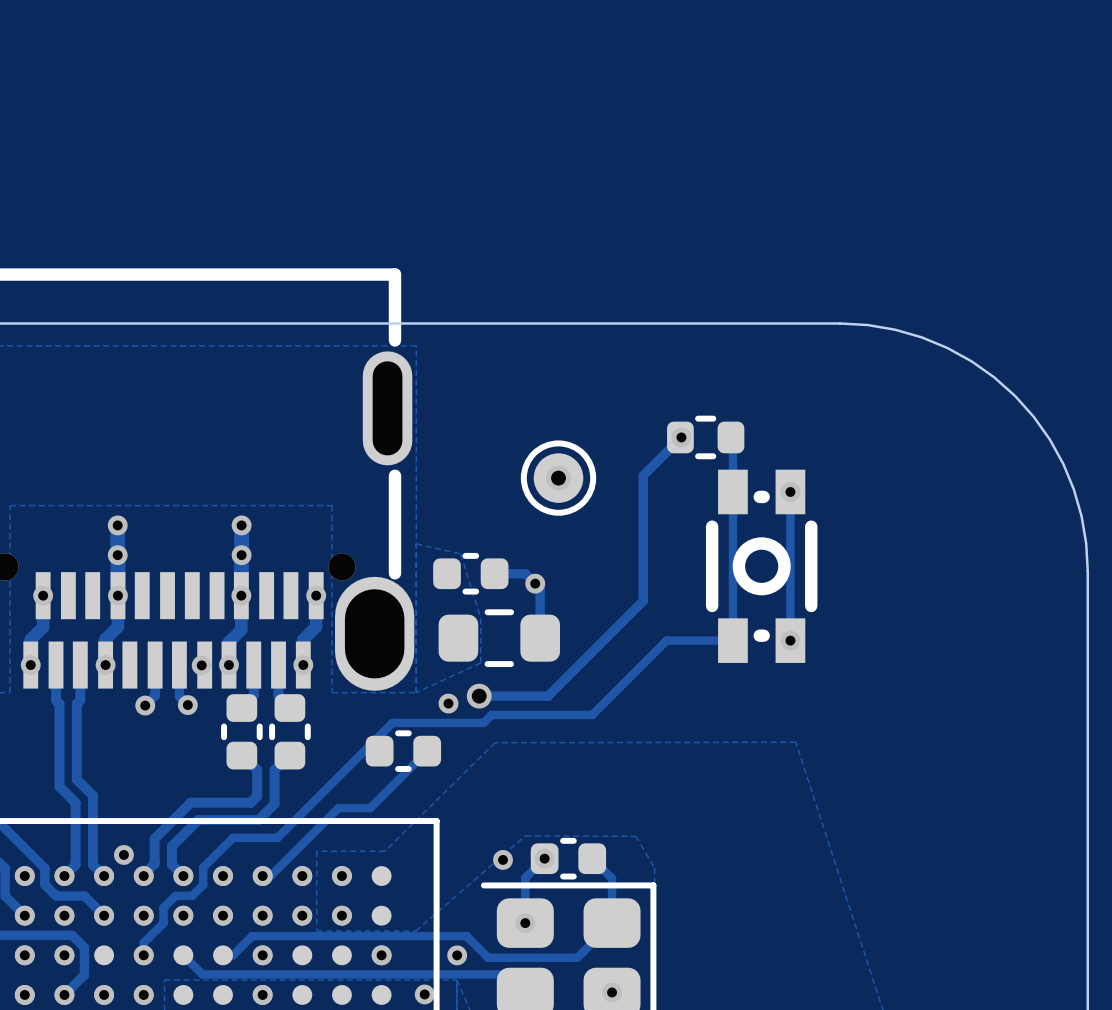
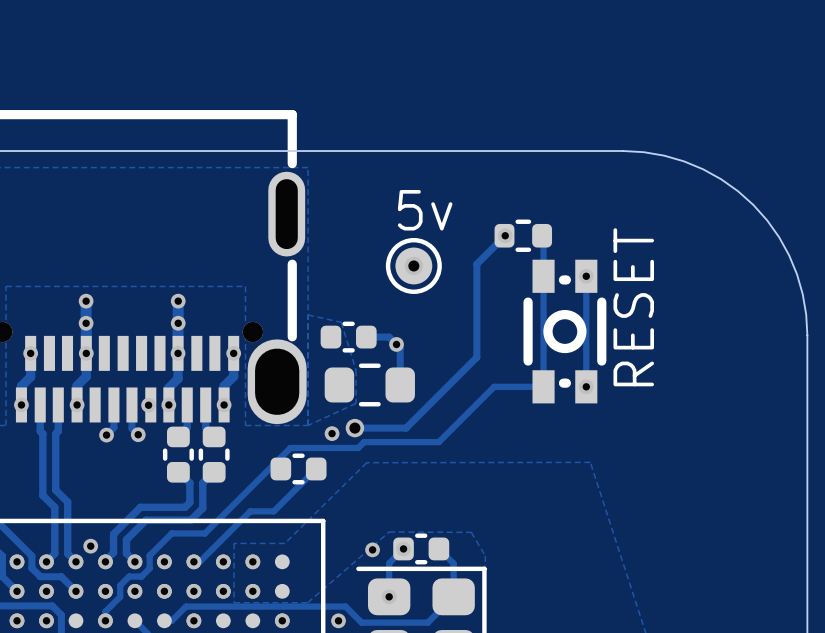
text: none -> 5v (425, 210)
text: none -> RESET (633, 307)

